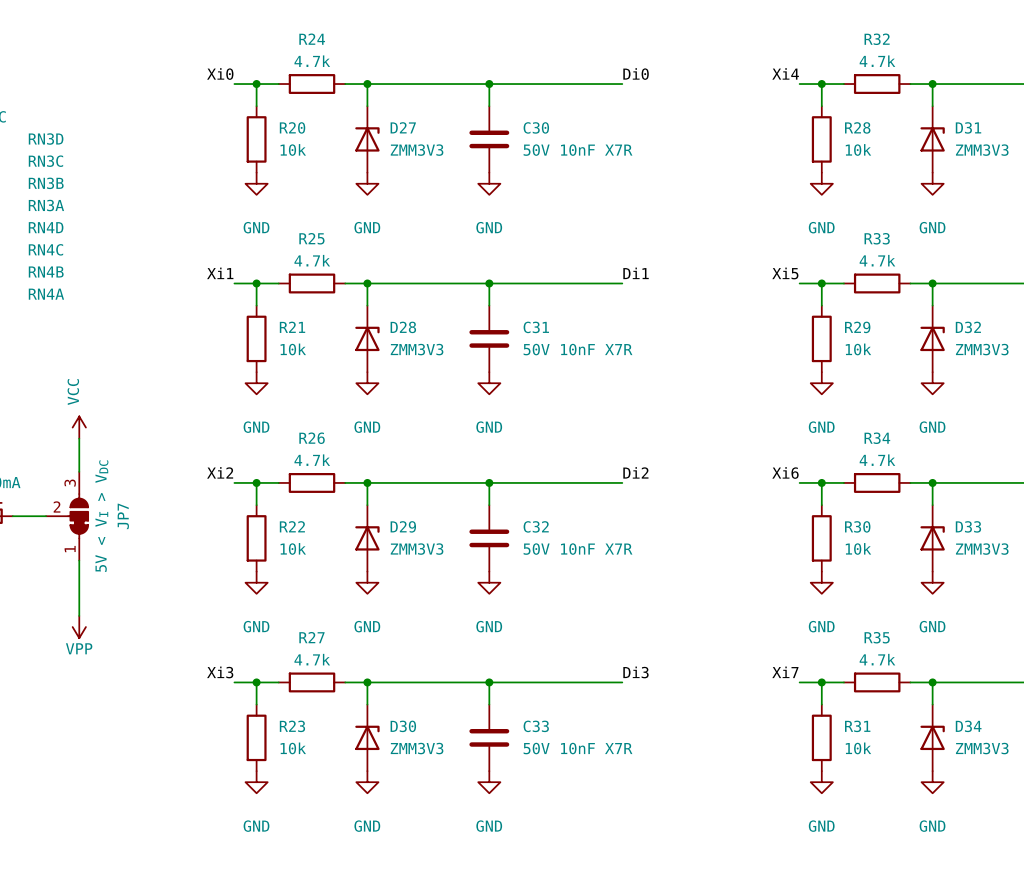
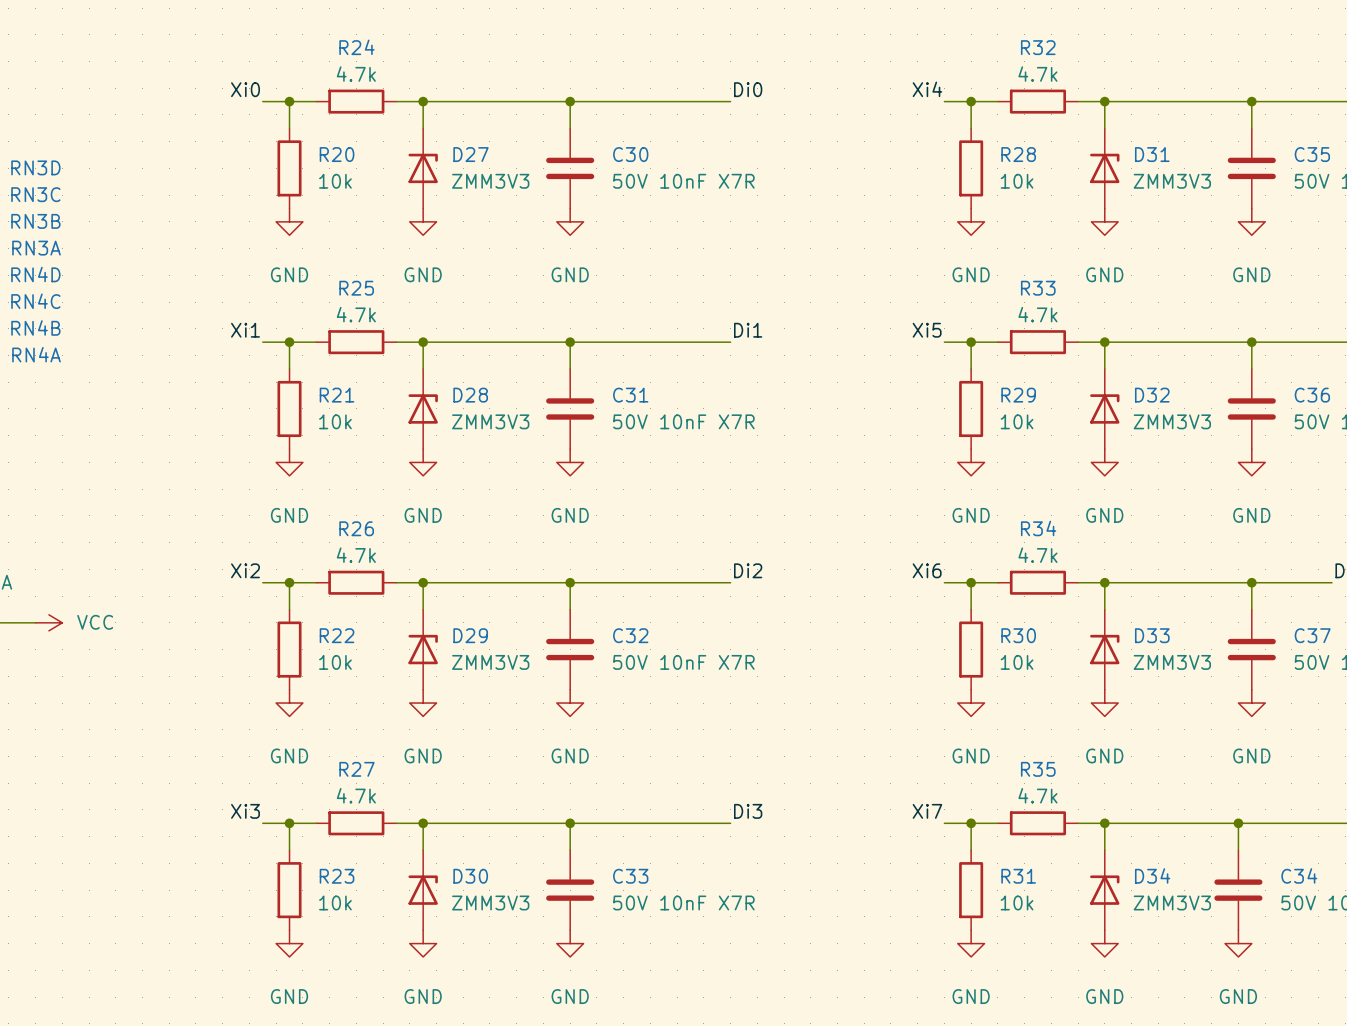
power symbol rotation: 0° (79, 427) -> 90° clockwise (48, 622)
power symbol position: VCC (79, 427) -> VCC (48, 622)
wire: (79, 438) (79, 471) -> none
JP7: 5V < VI > VDC (67, 516) -> none
wire: (79, 560) (79, 615) -> none
power symbol: VPP (79, 627) -> none

